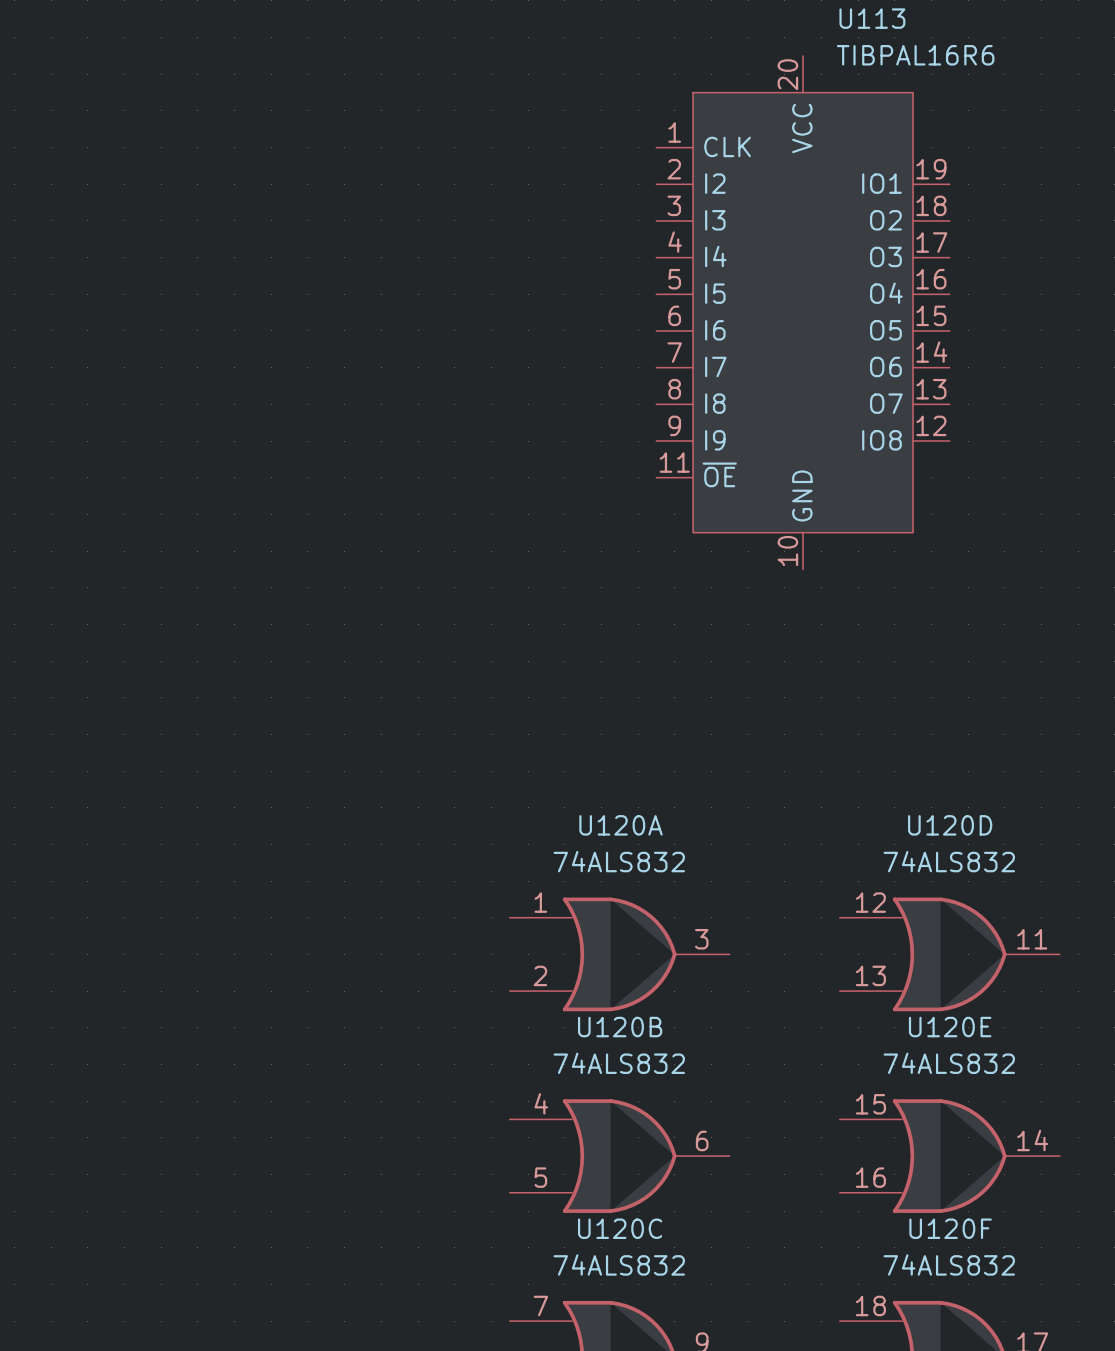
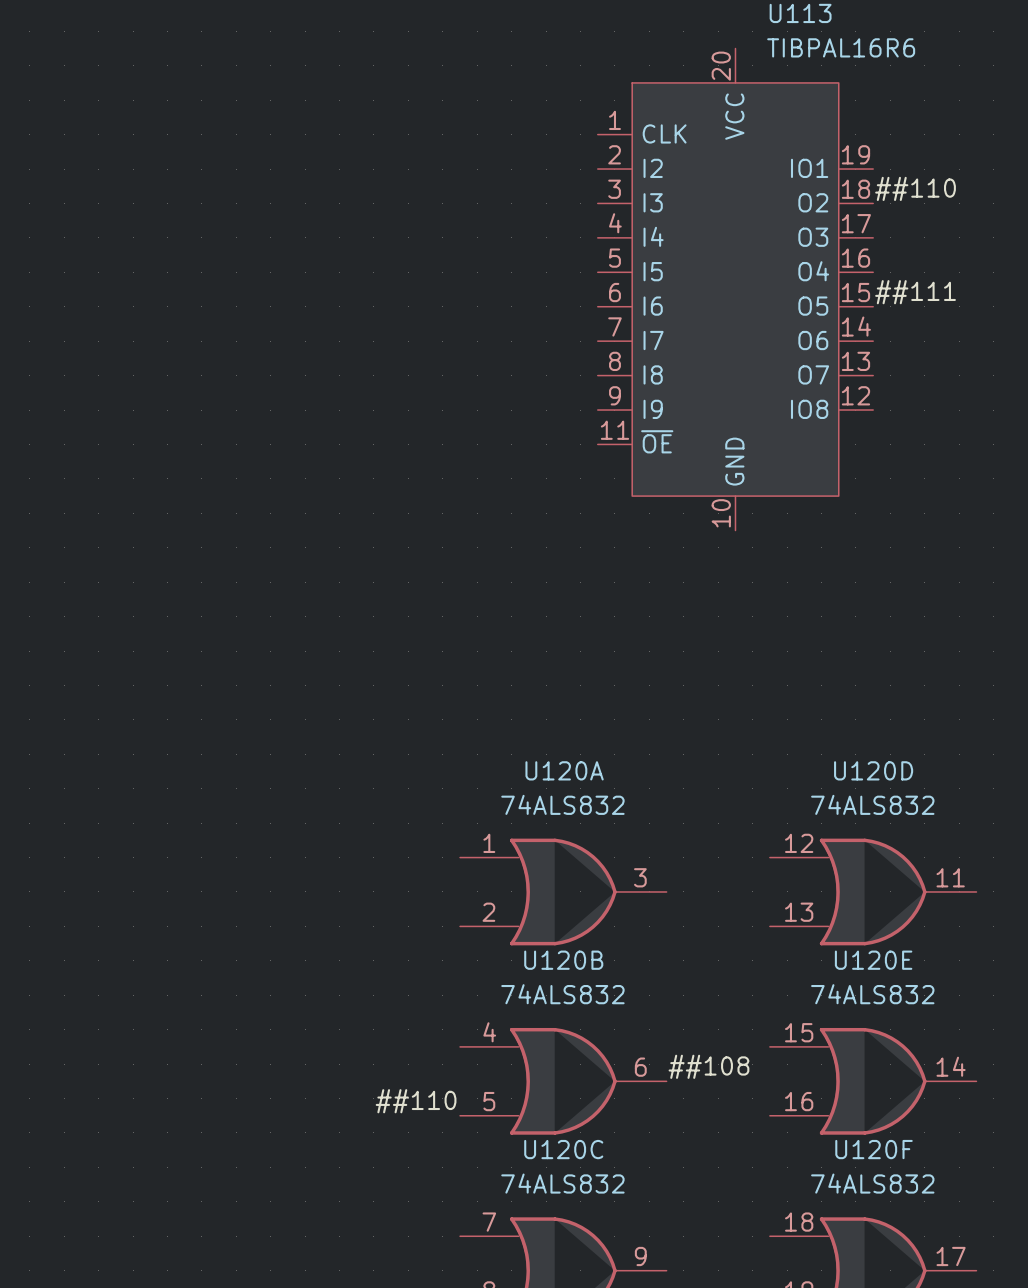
label: none -> ##110 (915, 188)
label: none -> ##111 (915, 292)
label: none -> ##108 (708, 1066)
label: none -> ##110 (416, 1101)

